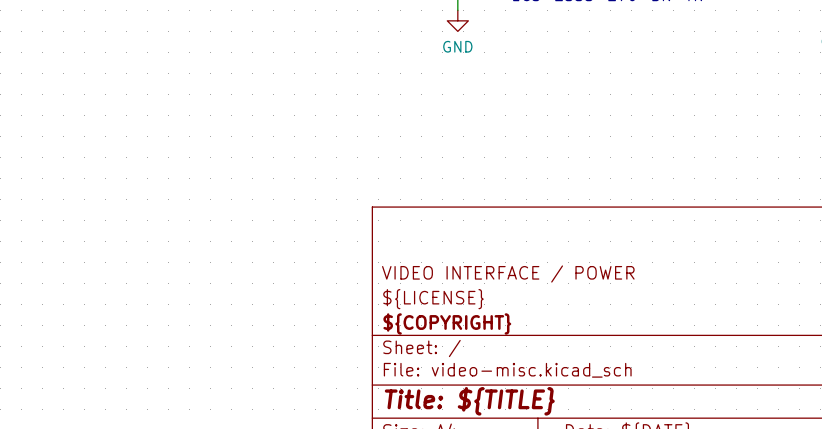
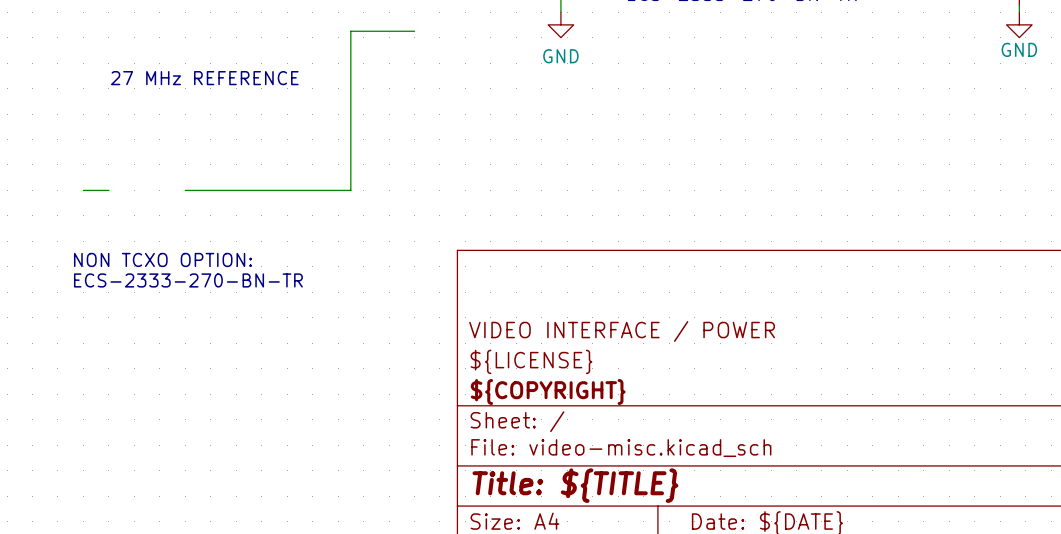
wire: none -> (414, 31) (350, 31) (350, 190) (185, 190)
text: none -> 27 MHz REFERENCE (204, 78)
wire: none -> (83, 190) (108, 190)
text: none -> NON TCXO OPTION: (162, 259)
text: none -> ECS-2333-270-BN-TR (188, 280)

